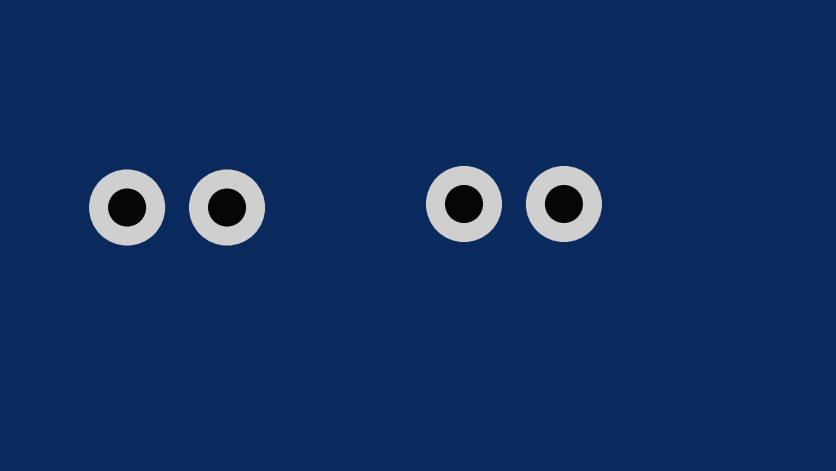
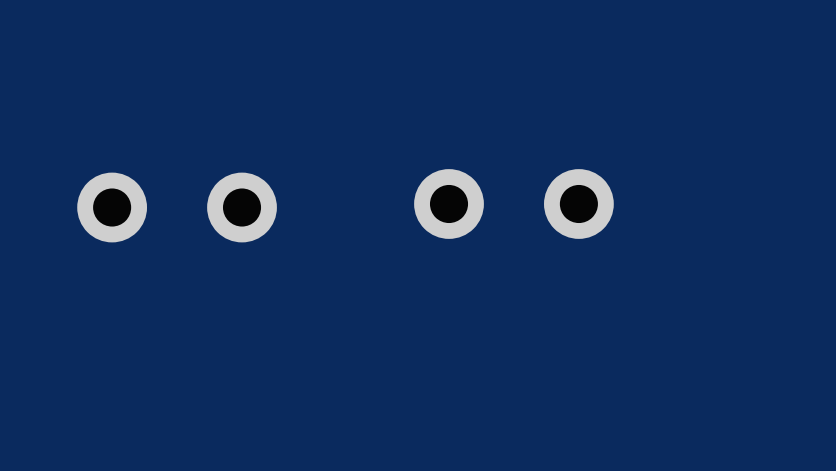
part footprint: [425, 165, 602, 243] -> [414, 169, 614, 239]
part footprint: [89, 169, 266, 246] -> [77, 172, 277, 243]

